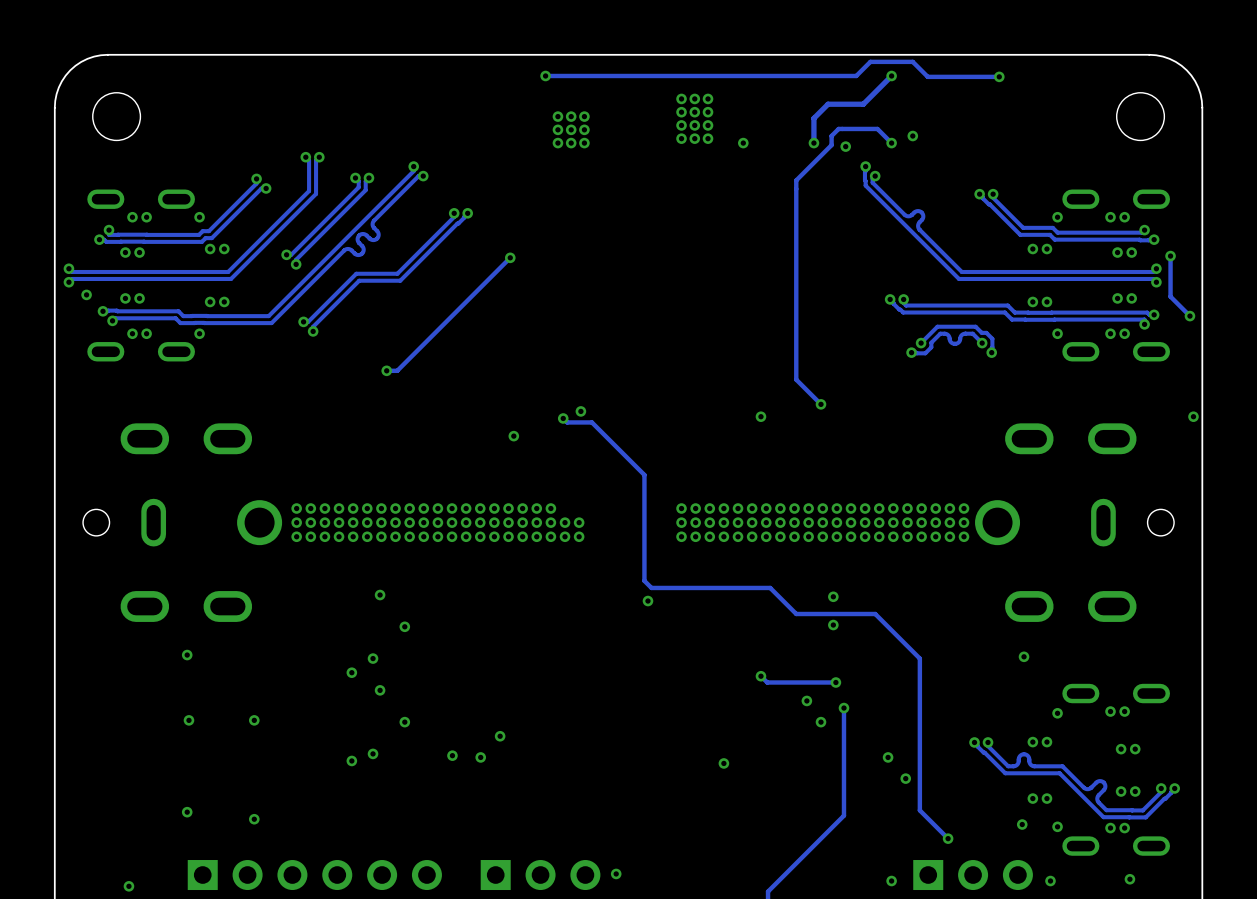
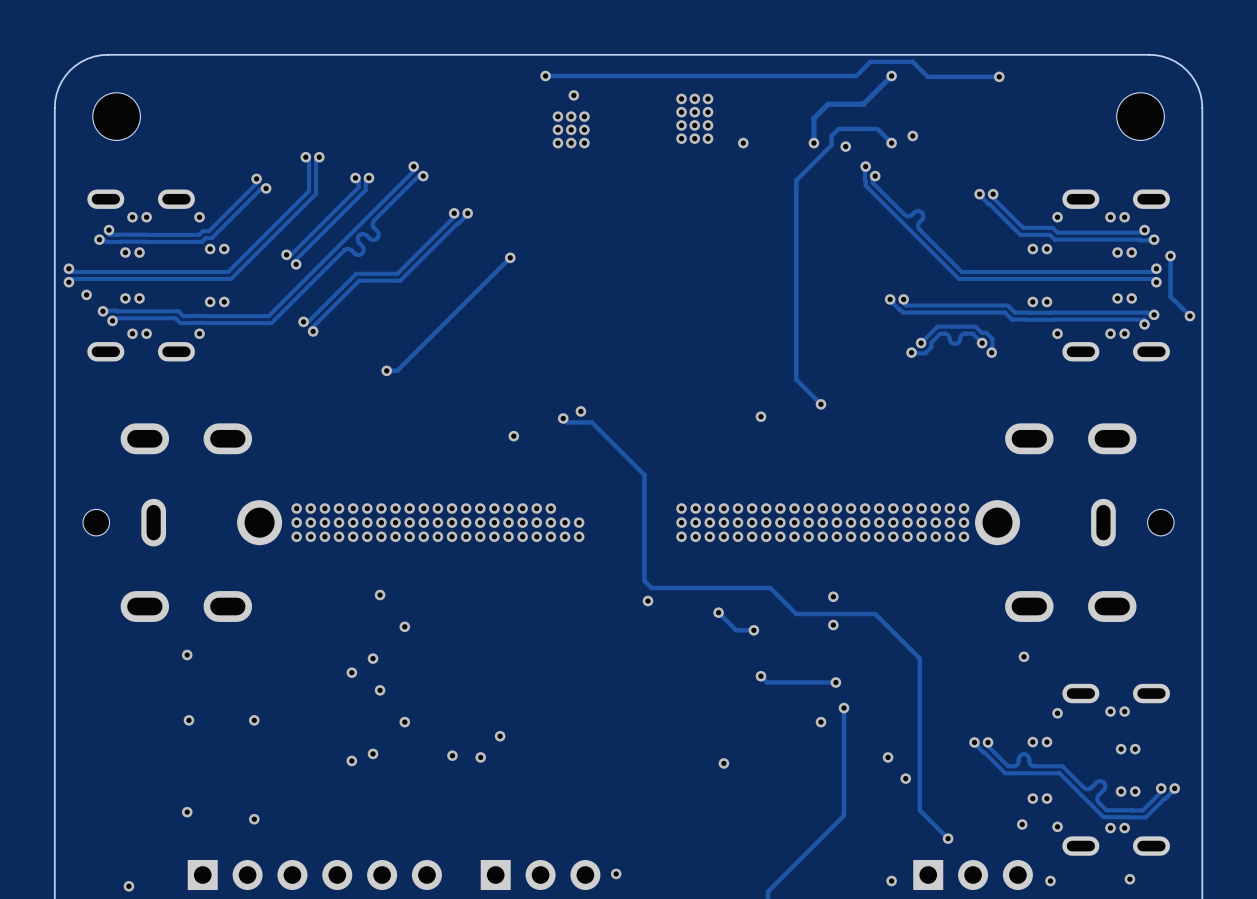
via: none -> (573, 95)
via: (1193, 416) -> none
track: none -> (718, 612) (736, 630) (753, 630)
via: none -> (718, 612)
via: none -> (753, 630)
via: (806, 700) -> none

